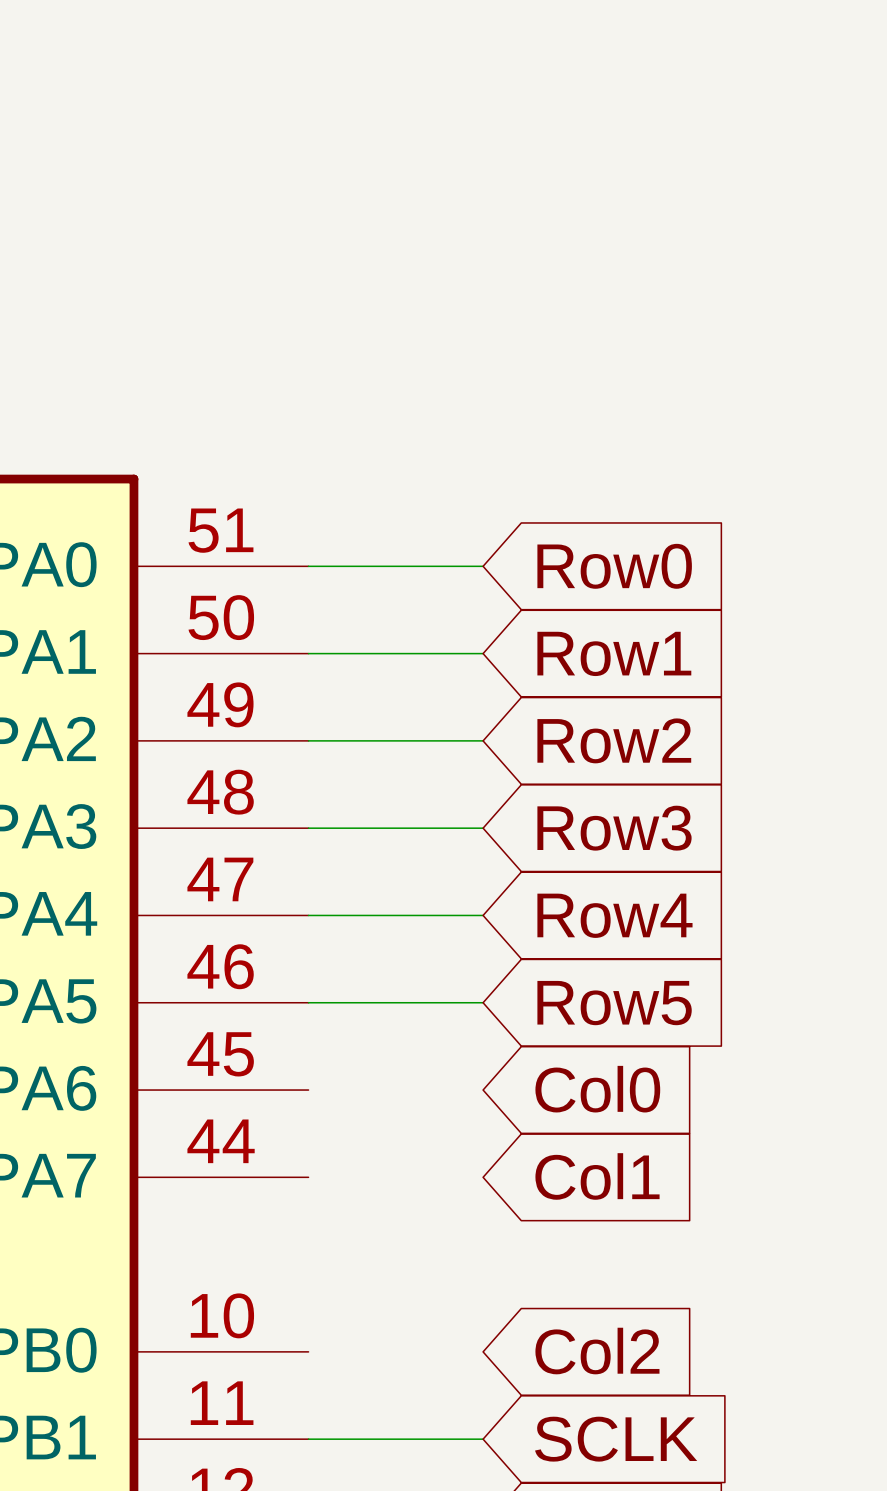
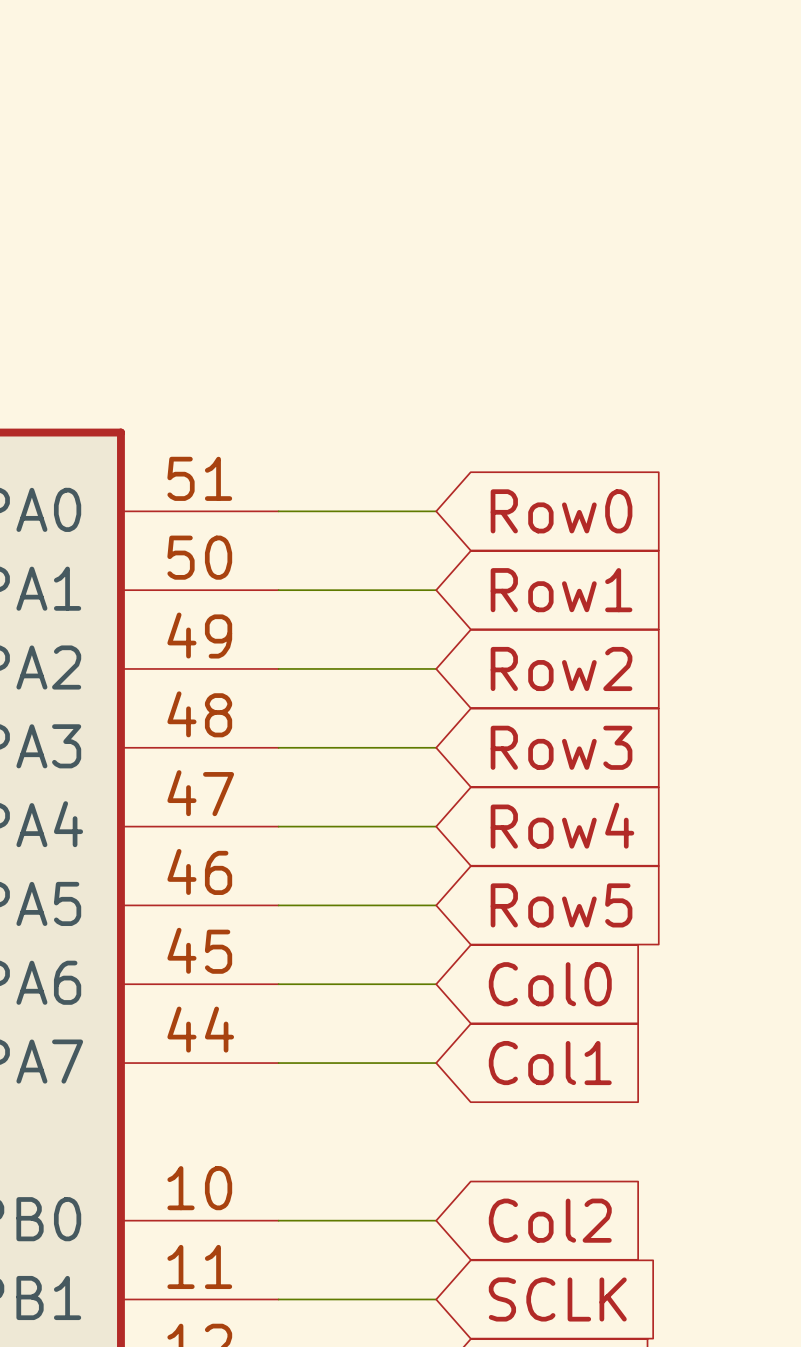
wire: none -> (278, 984) (436, 984)
wire: none -> (278, 1063) (436, 1063)
wire: none -> (278, 1220) (436, 1220)

